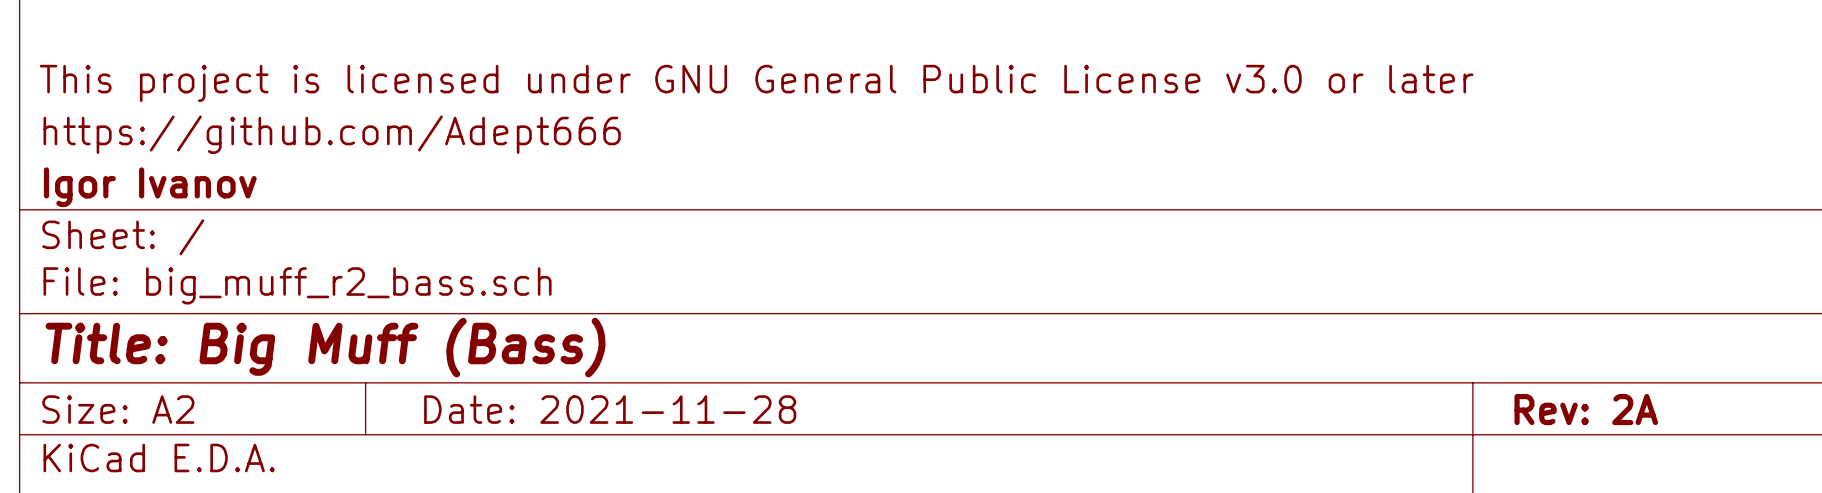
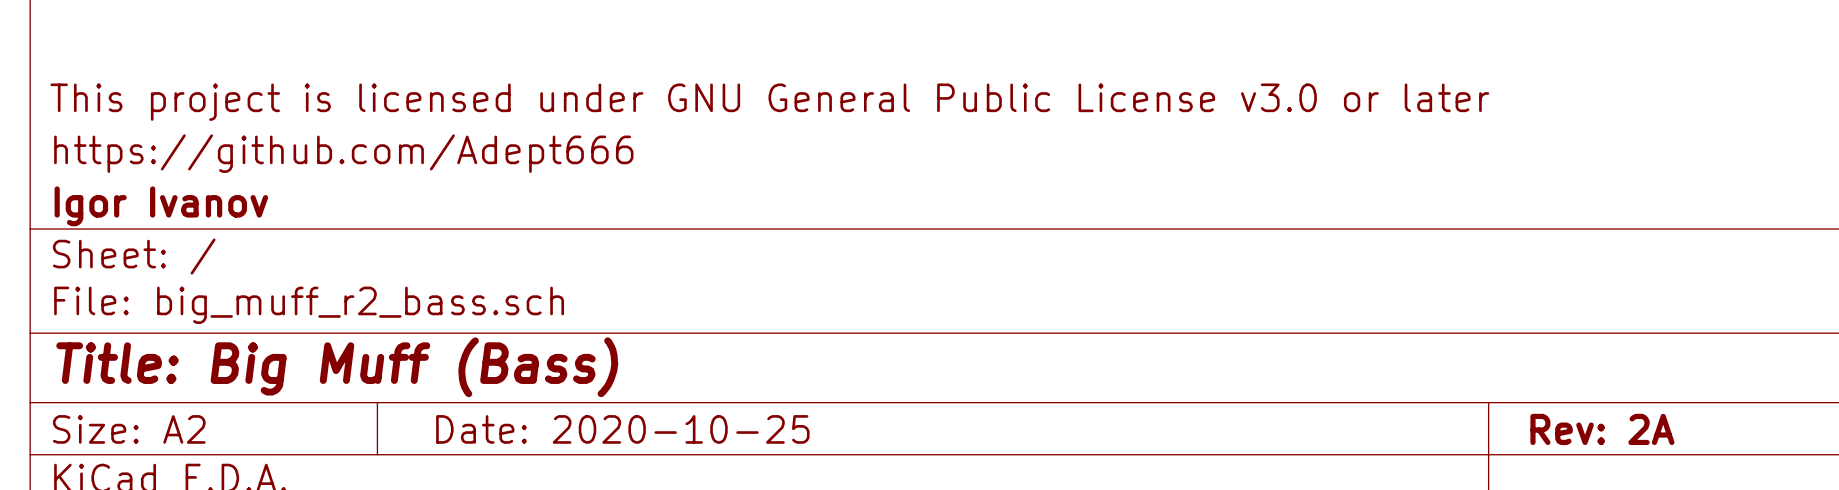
title block: Date: 2021-11-28 (610, 409) -> Date: 2020-10-25 (622, 429)

